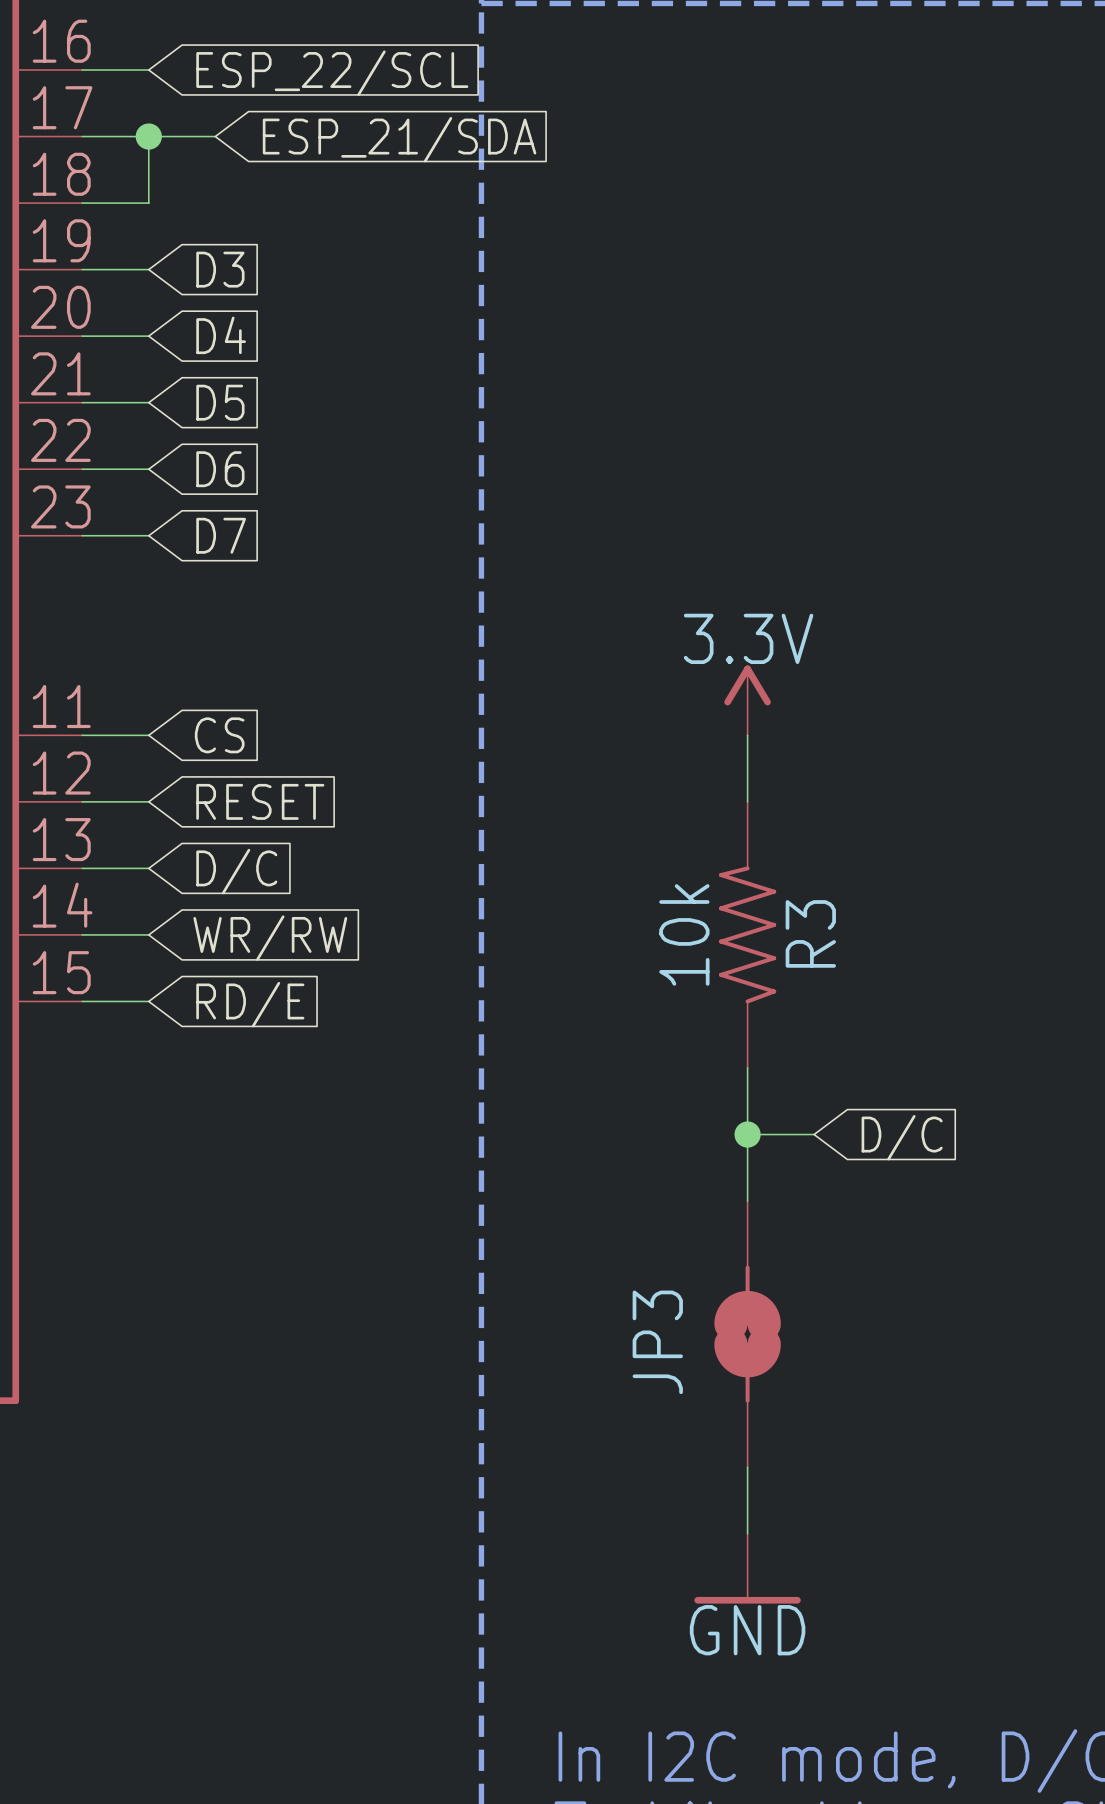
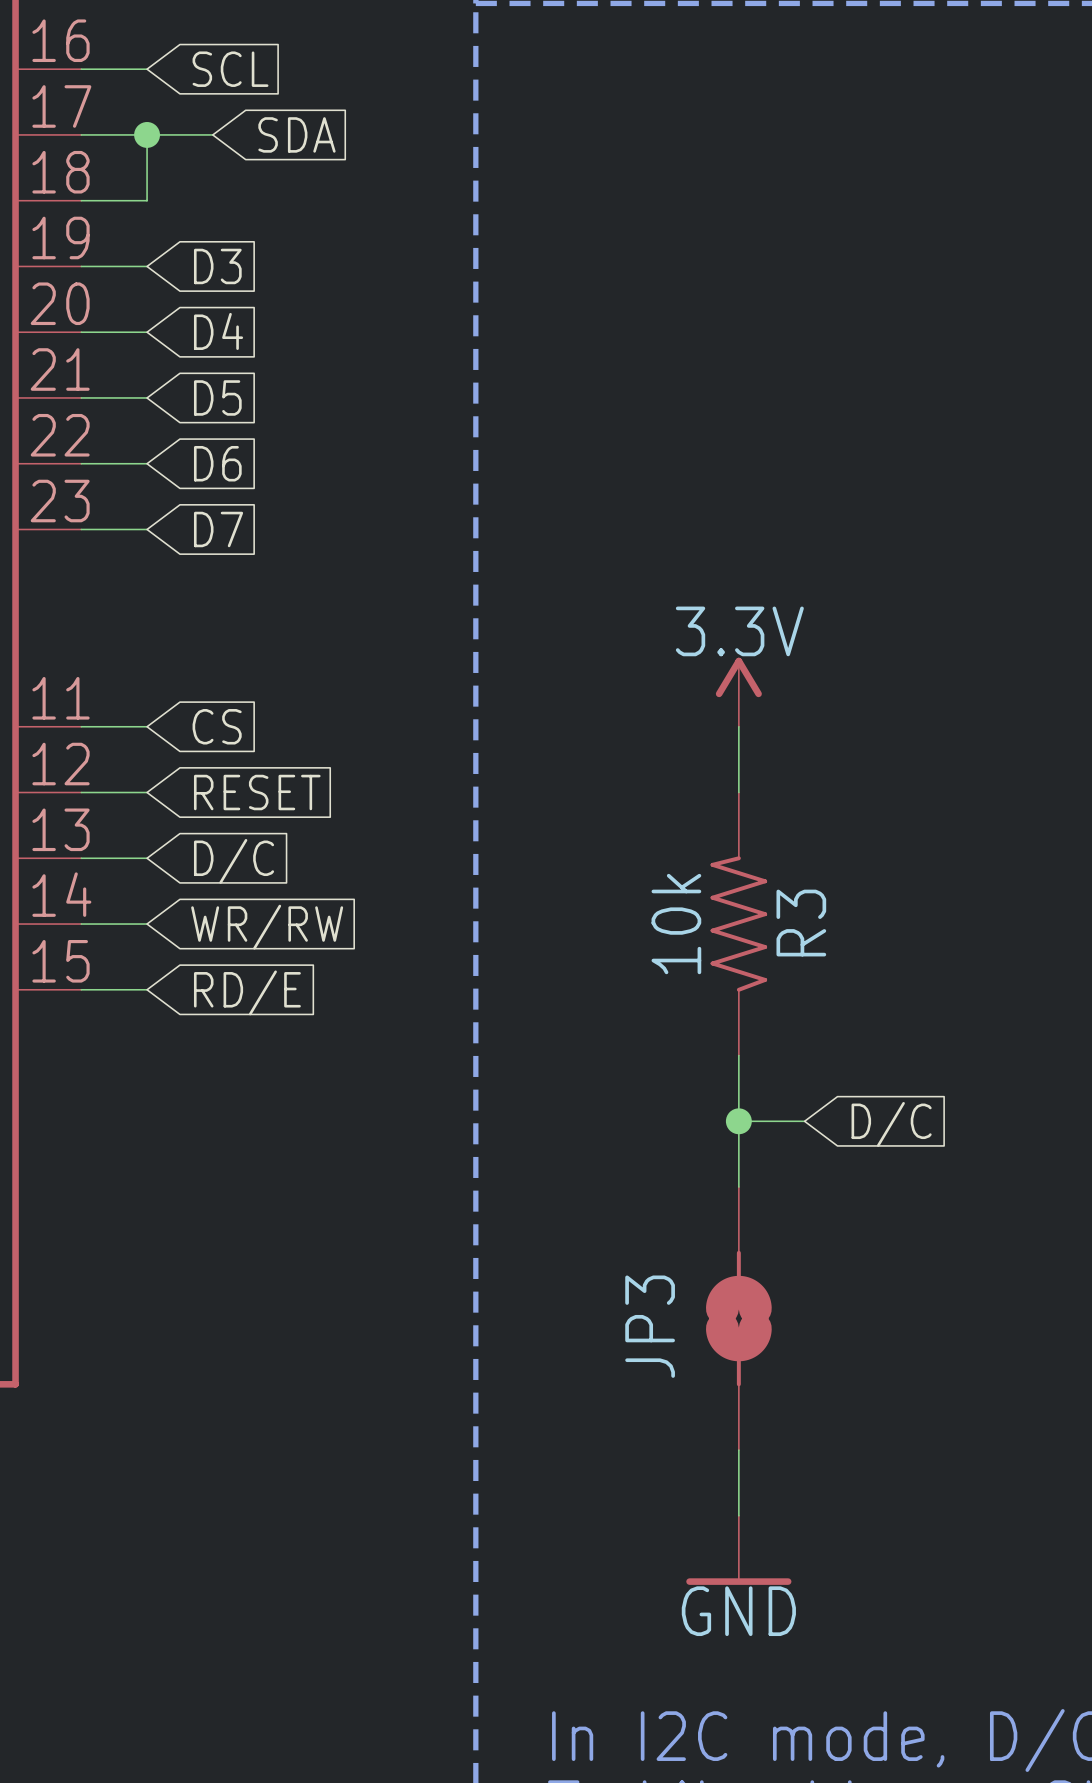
global label: ESP_22/SCL (332, 73) -> SCL (230, 69)
global label: ESP_21/SDA (399, 139) -> SDA (296, 134)

